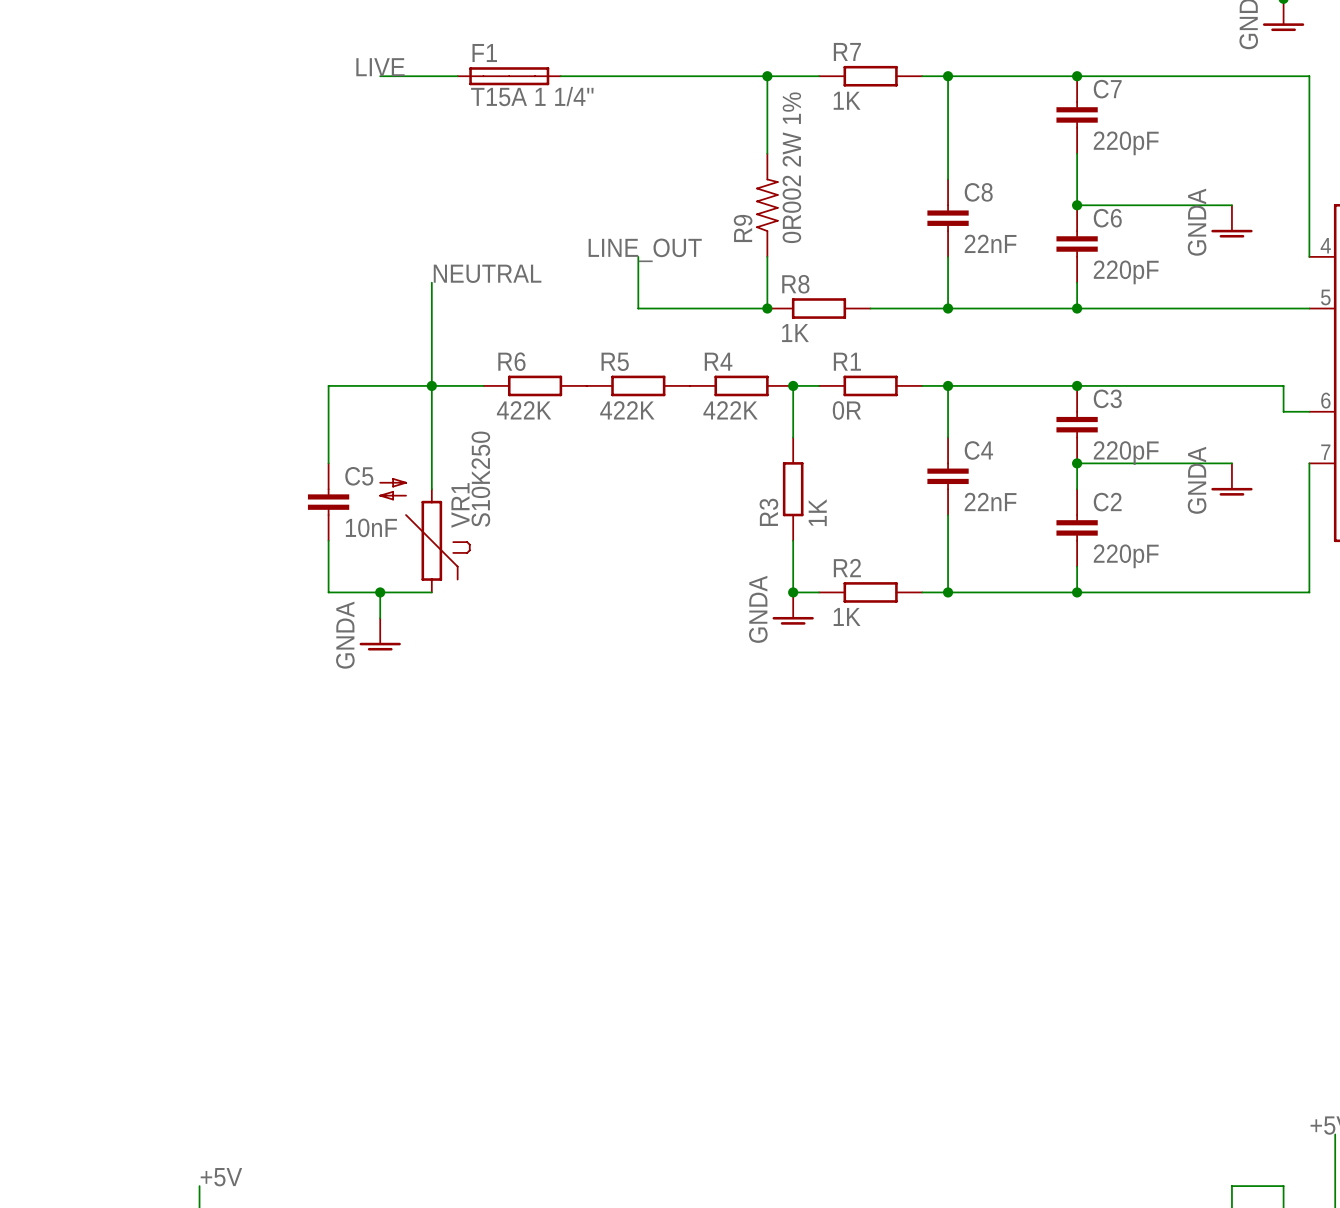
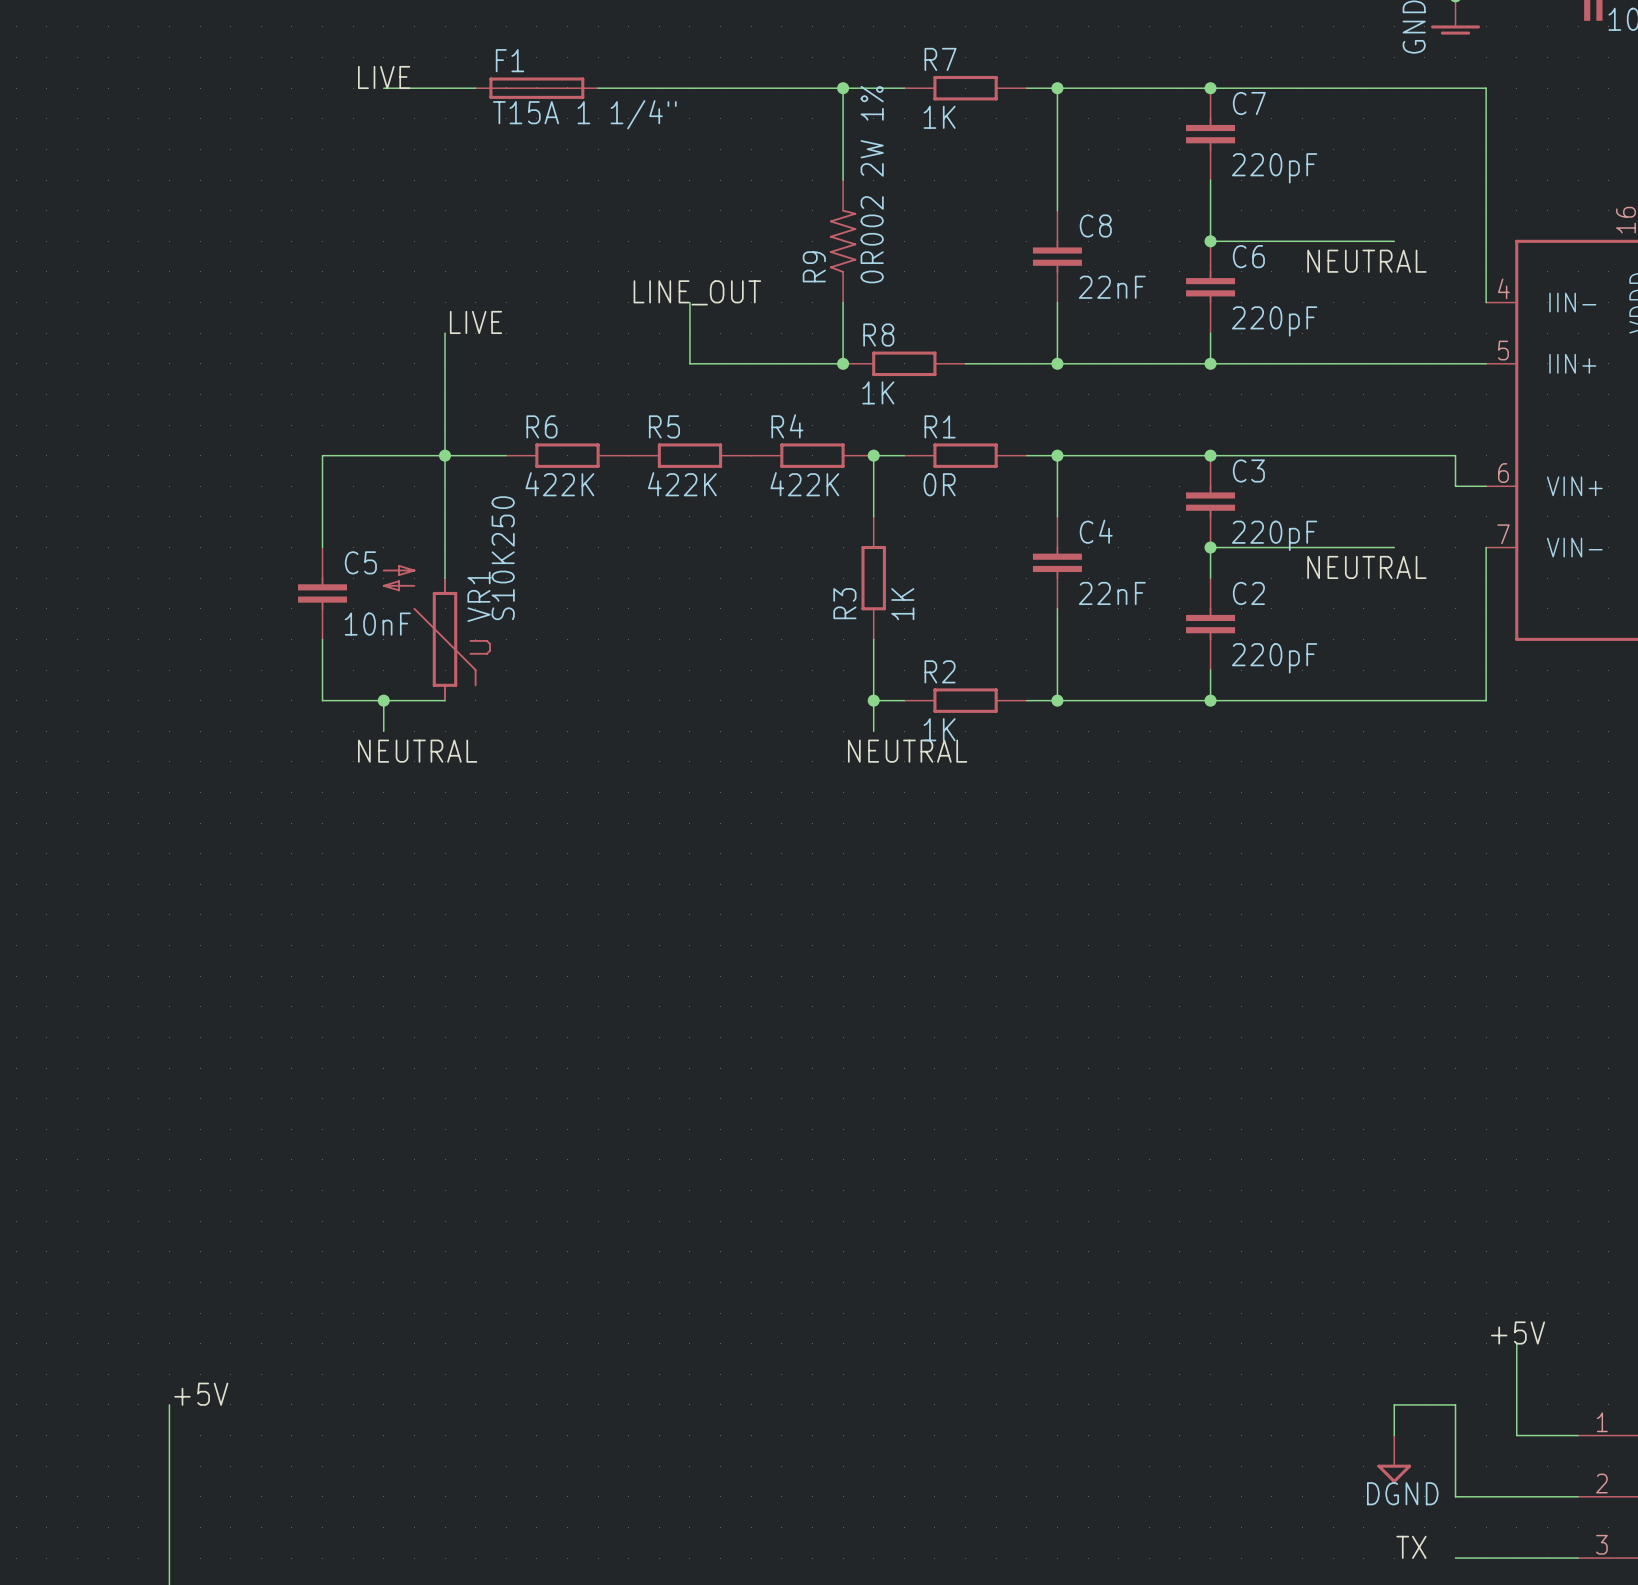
power symbol: GNDA (1231, 221) -> none
label: none -> NEUTRAL (1366, 261)
label: NEUTRAL (487, 273) -> LIVE (475, 322)
power symbol: GNDA (1231, 479) -> none
label: none -> NEUTRAL (1366, 567)
power symbol: GNDA (793, 608) -> none
power symbol: GNDA (380, 634) -> none
label: none -> NEUTRAL (417, 751)
label: none -> NEUTRAL (907, 751)

